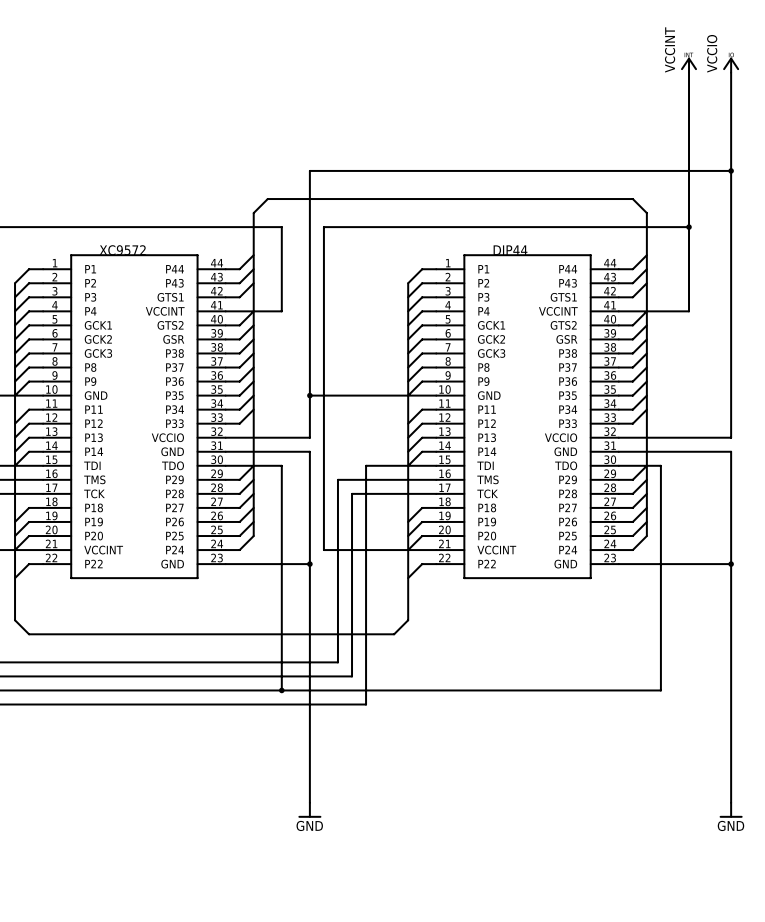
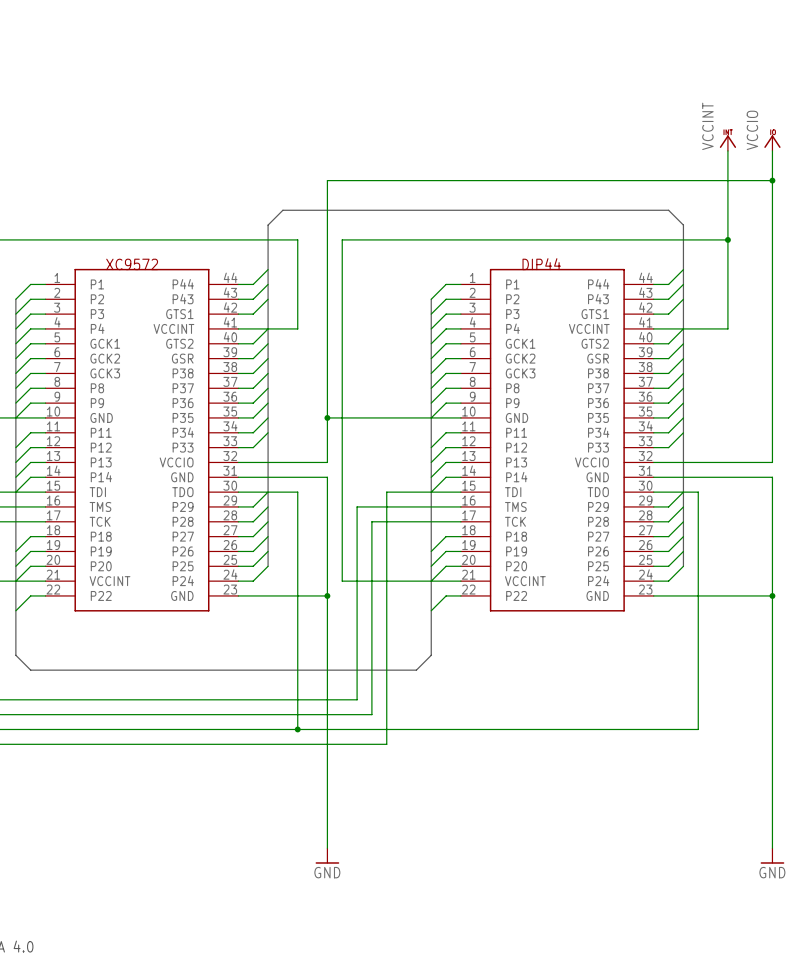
power symbol position: VCCINT (689, 65) -> VCCINT (727, 143)
power symbol position: VCCIO (731, 65) -> VCCIO (772, 143)
wire: (689, 72) (689, 142) -> none
wire: (731, 72) (731, 142) -> none

